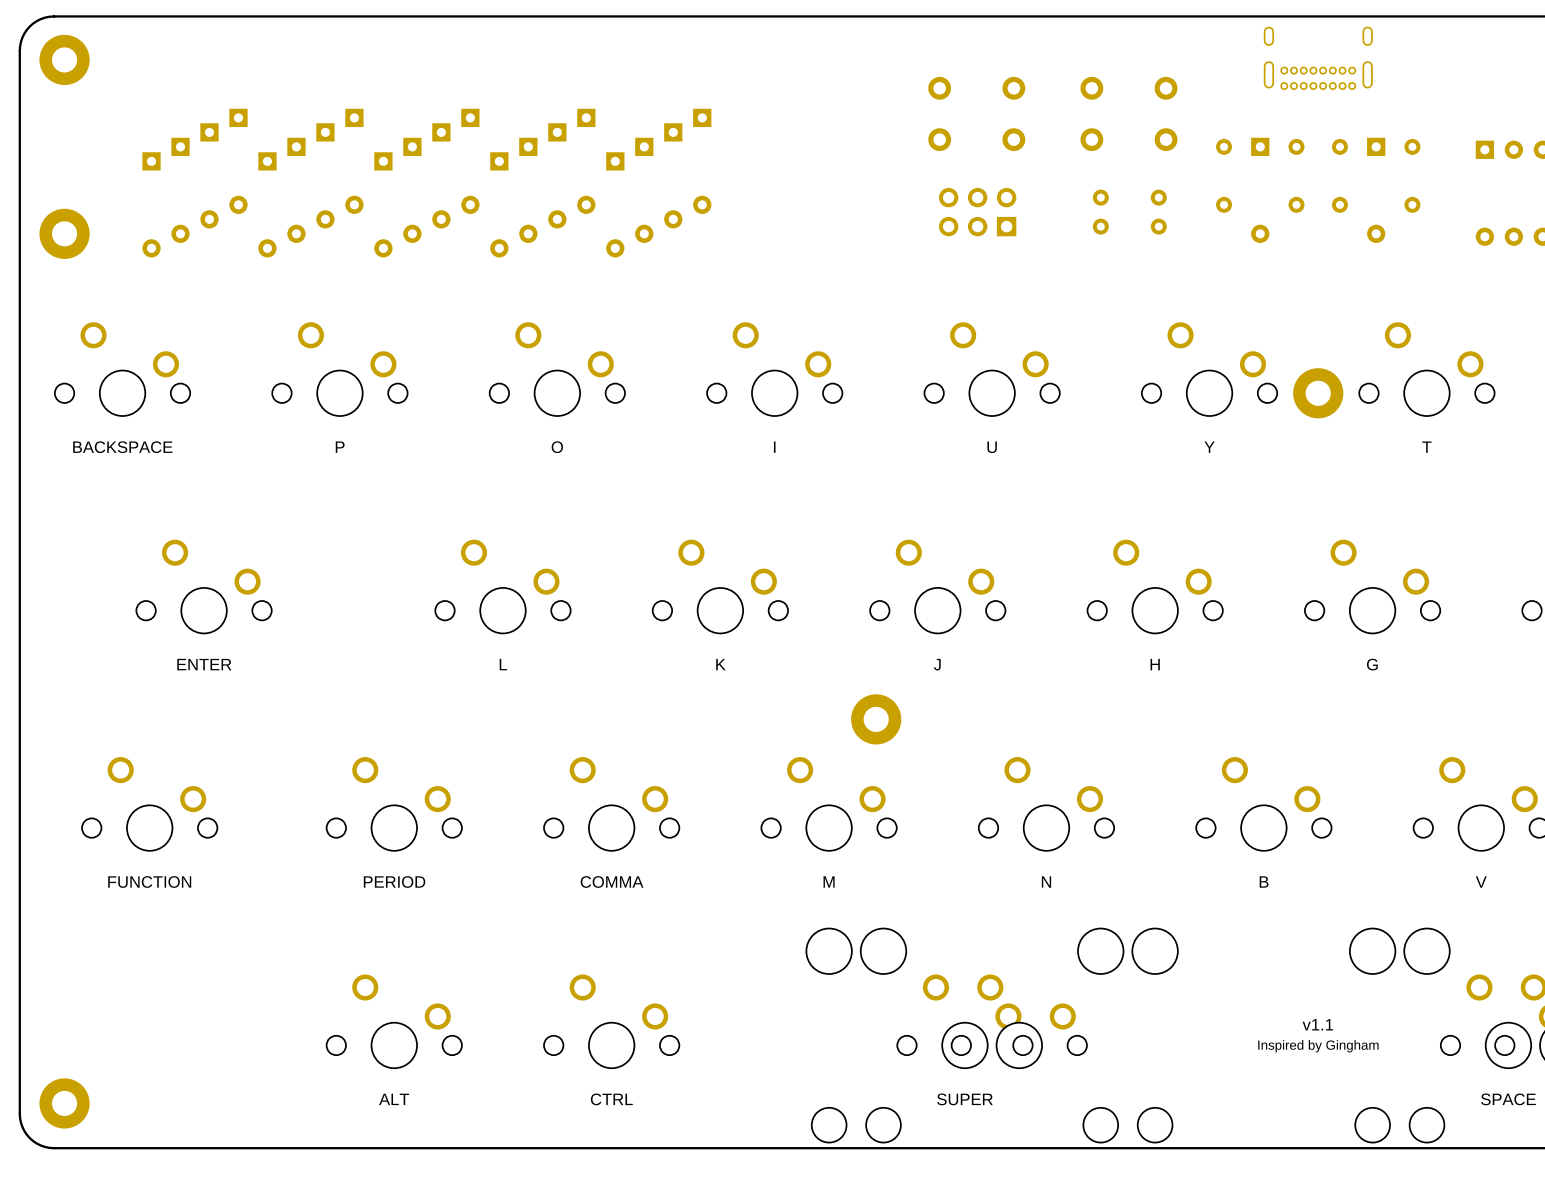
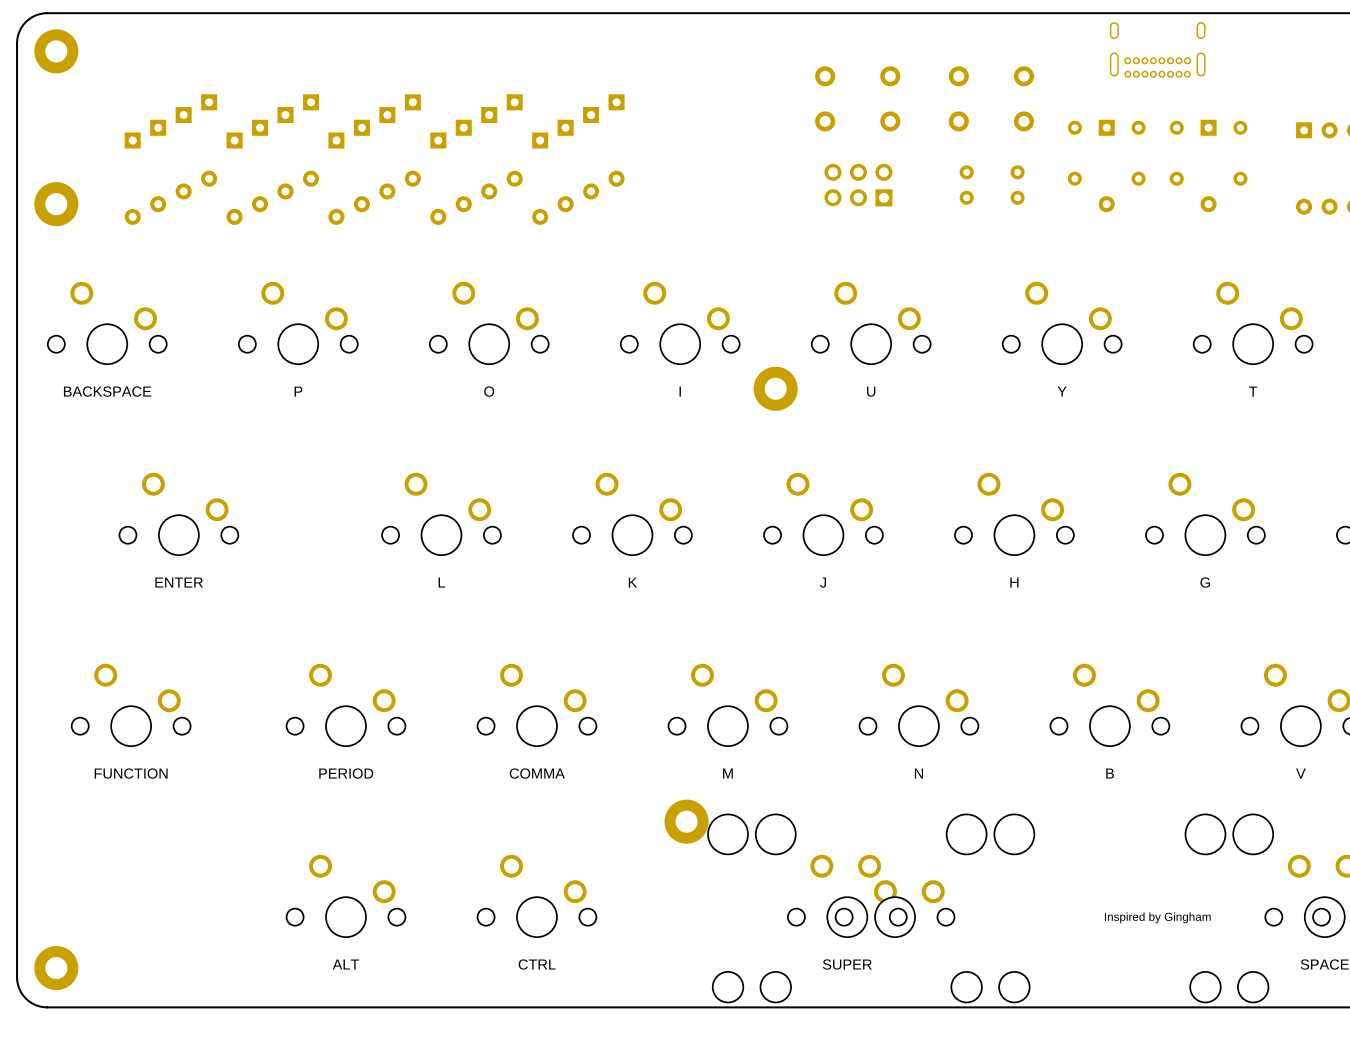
part: (1318, 393) -> none
part: none -> (775, 388)
part: (876, 719) -> none
part: none -> (686, 821)
text: v1.1 (1317, 1024) -> none

